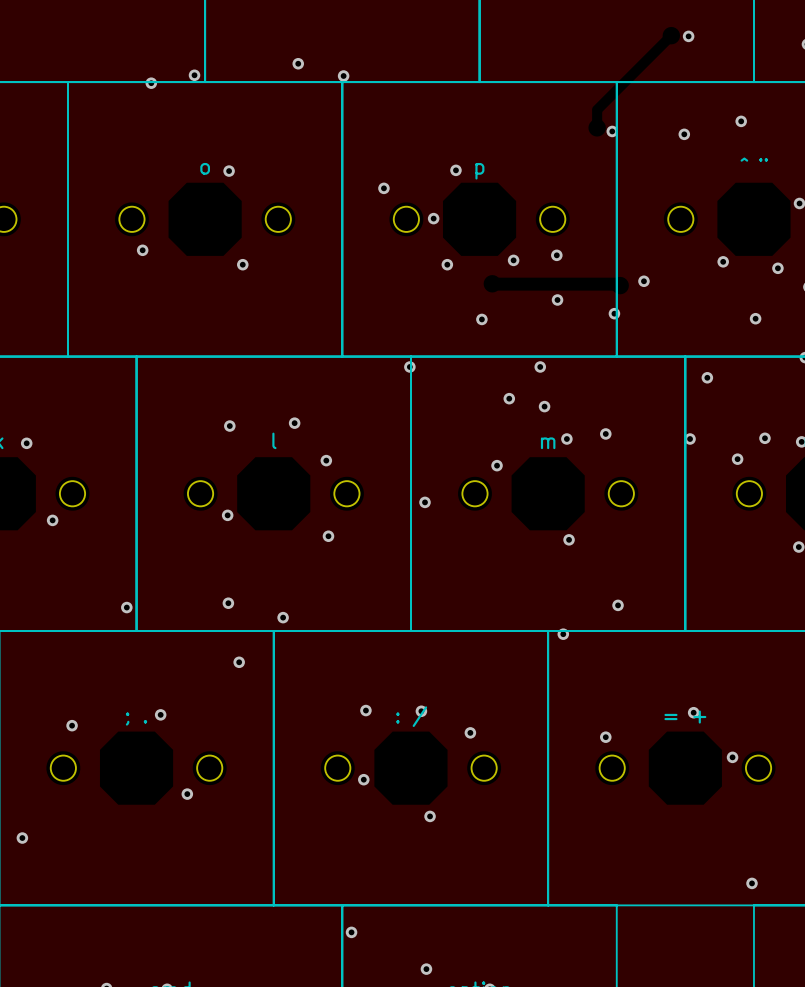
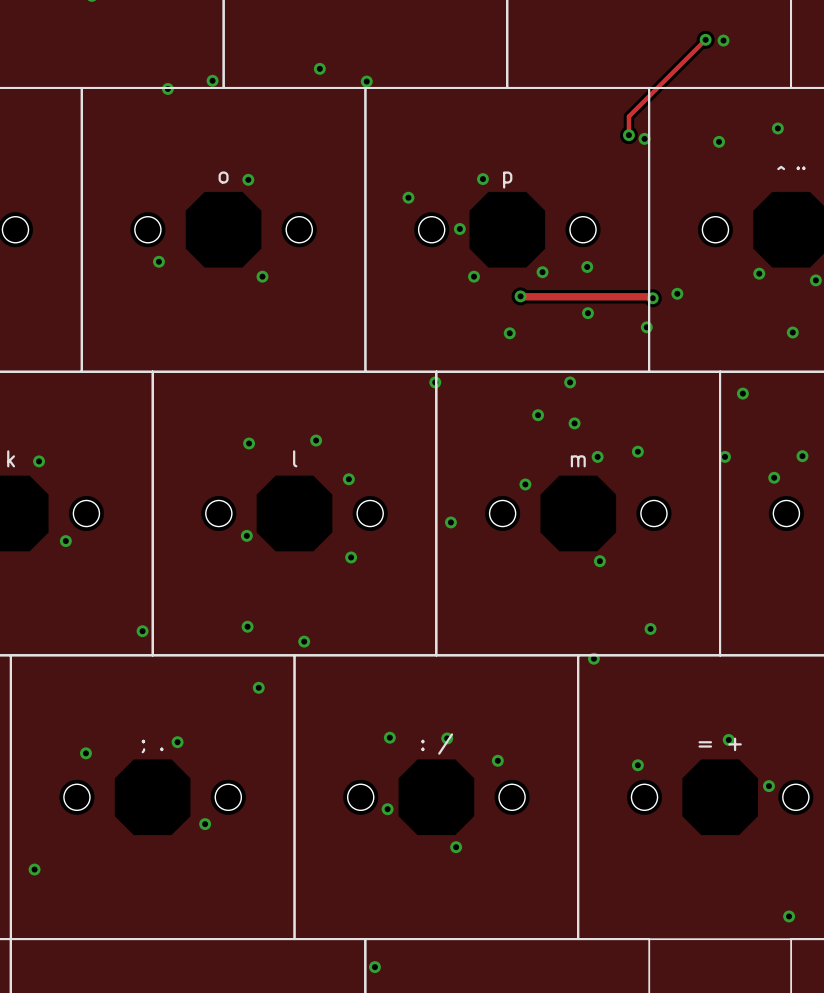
track: none -> (705, 39) (628, 116) (628, 135)
via: none -> (705, 39)
via: none -> (628, 135)
track: none -> (520, 296) (652, 298)
via: none -> (520, 296)
via: none -> (652, 298)

